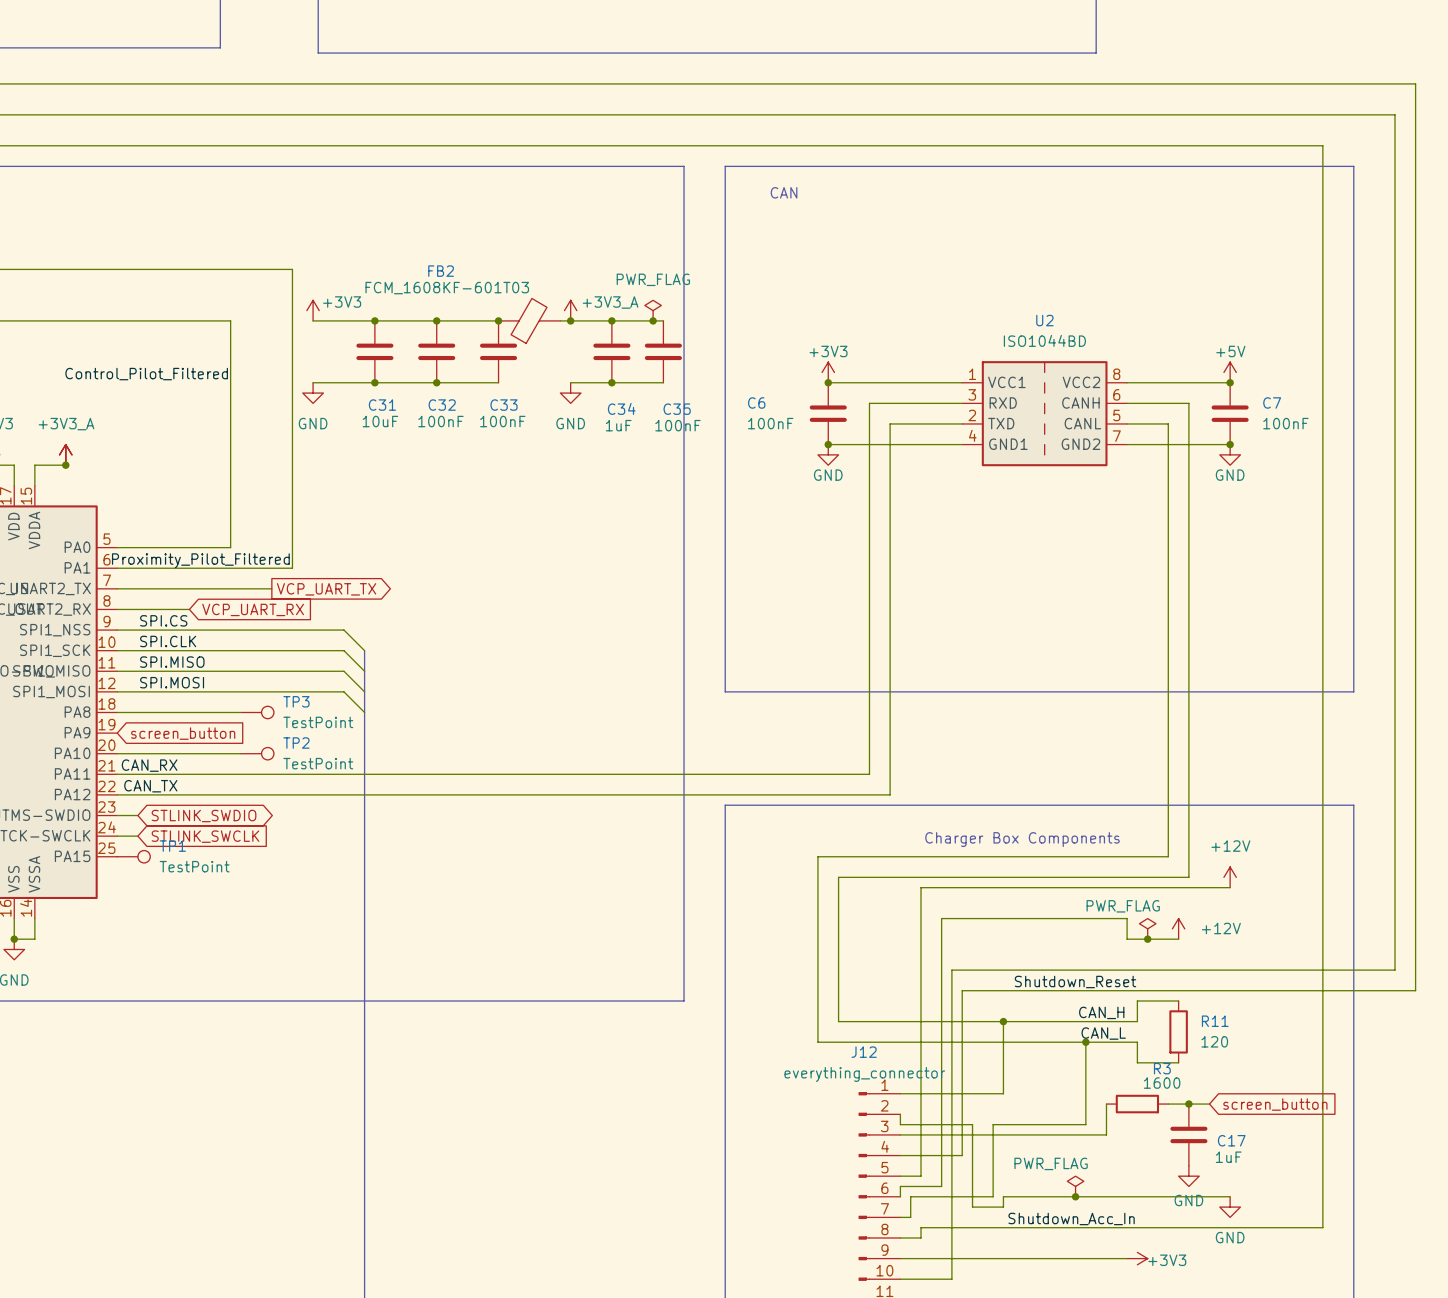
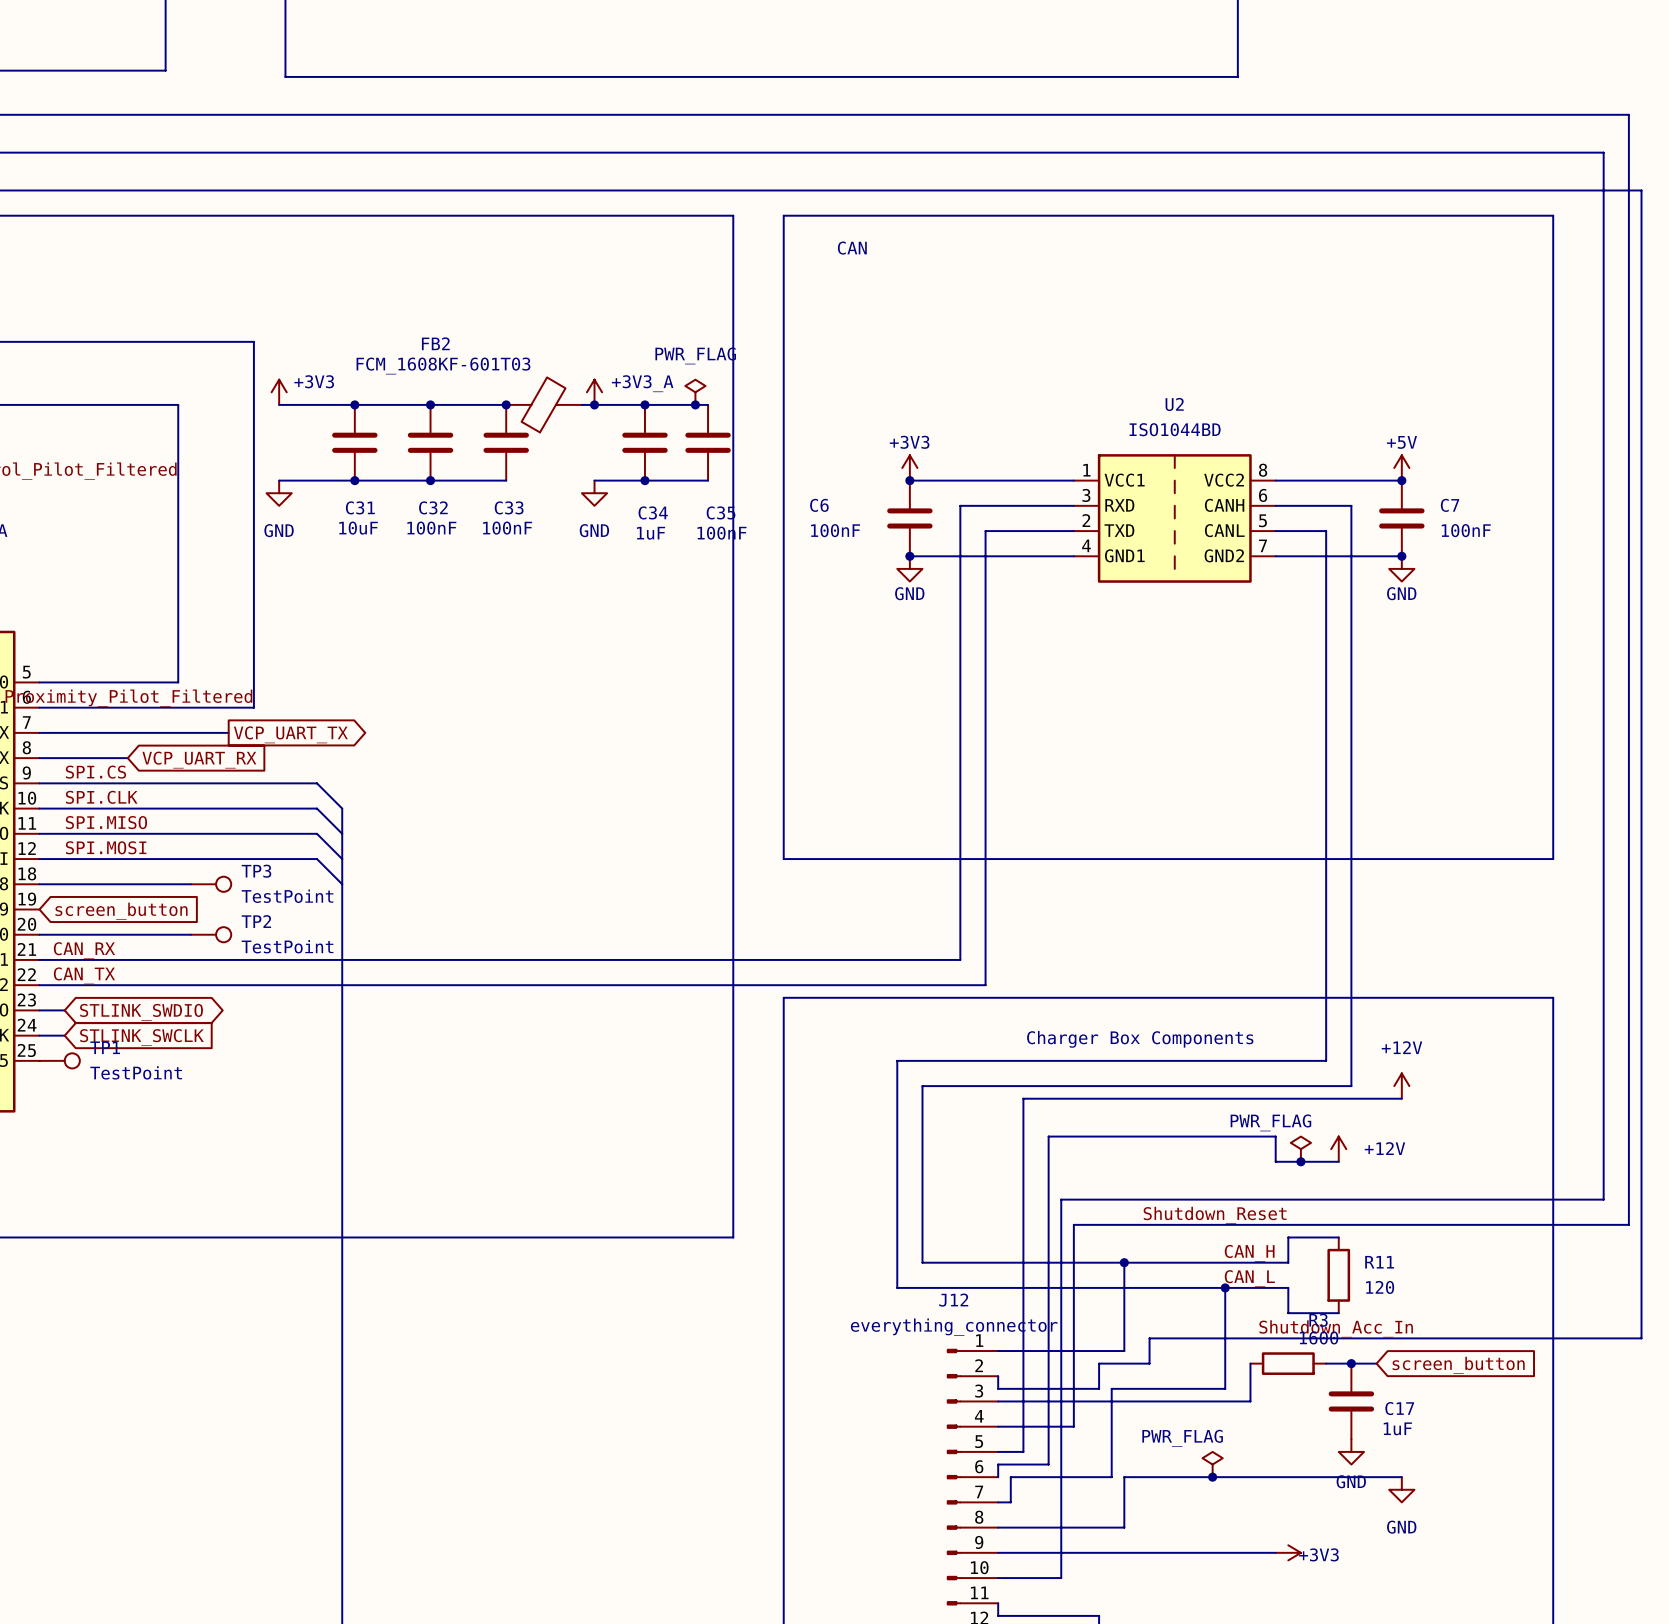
wire: (1322, 145) (1322, 1227) (921, 1227) (921, 1237) -> (1515, 190) (1641, 190) (1641, 1338) (1149, 1338) (1149, 1363) (1099, 1363) (1099, 1388) (1086, 1388)
wire: (972, 1124) (972, 1207) (1003, 1207) -> (1023, 1527) (1124, 1527) (1124, 1489)
label position: Shutdown_Acc_In (1071, 1218) -> Shutdown_Acc_In (1336, 1328)

